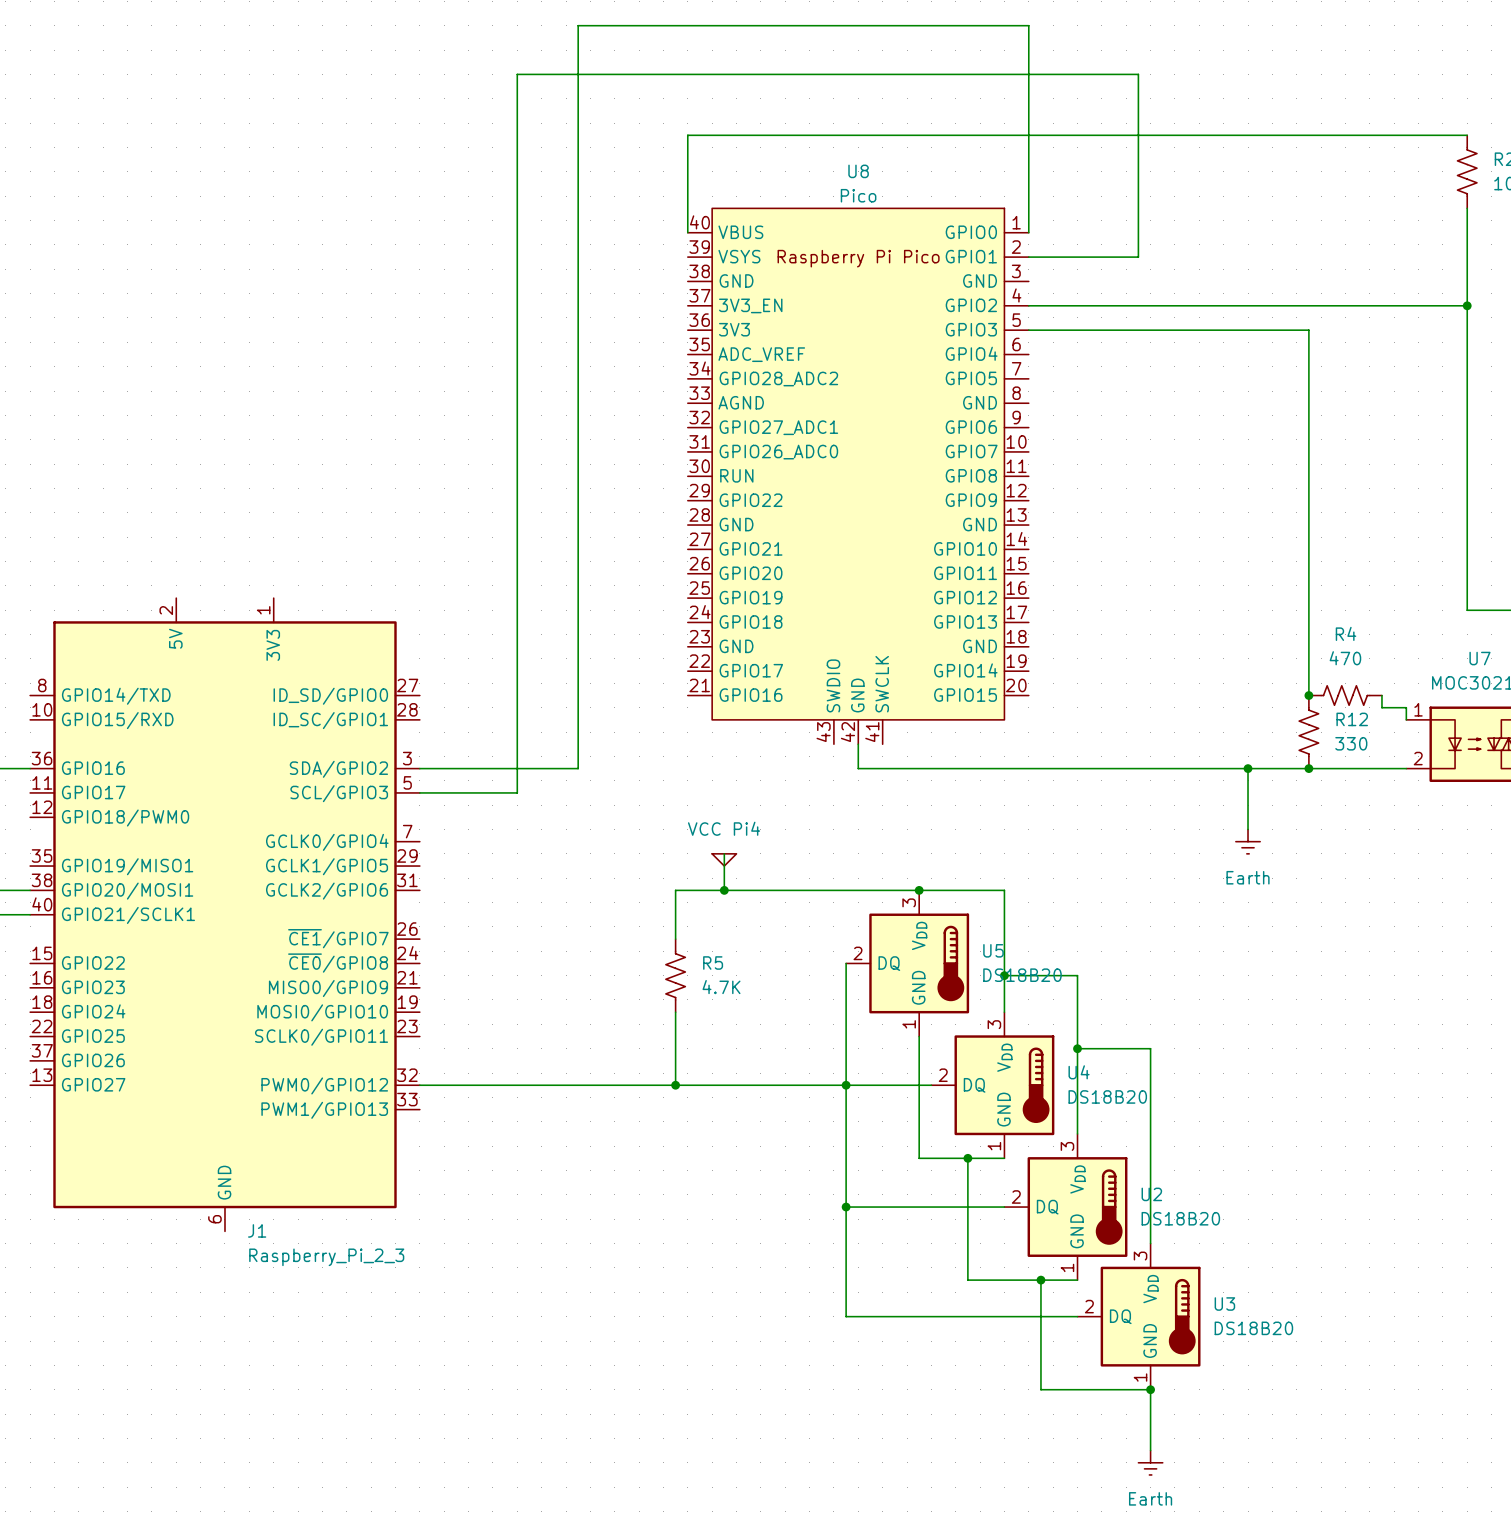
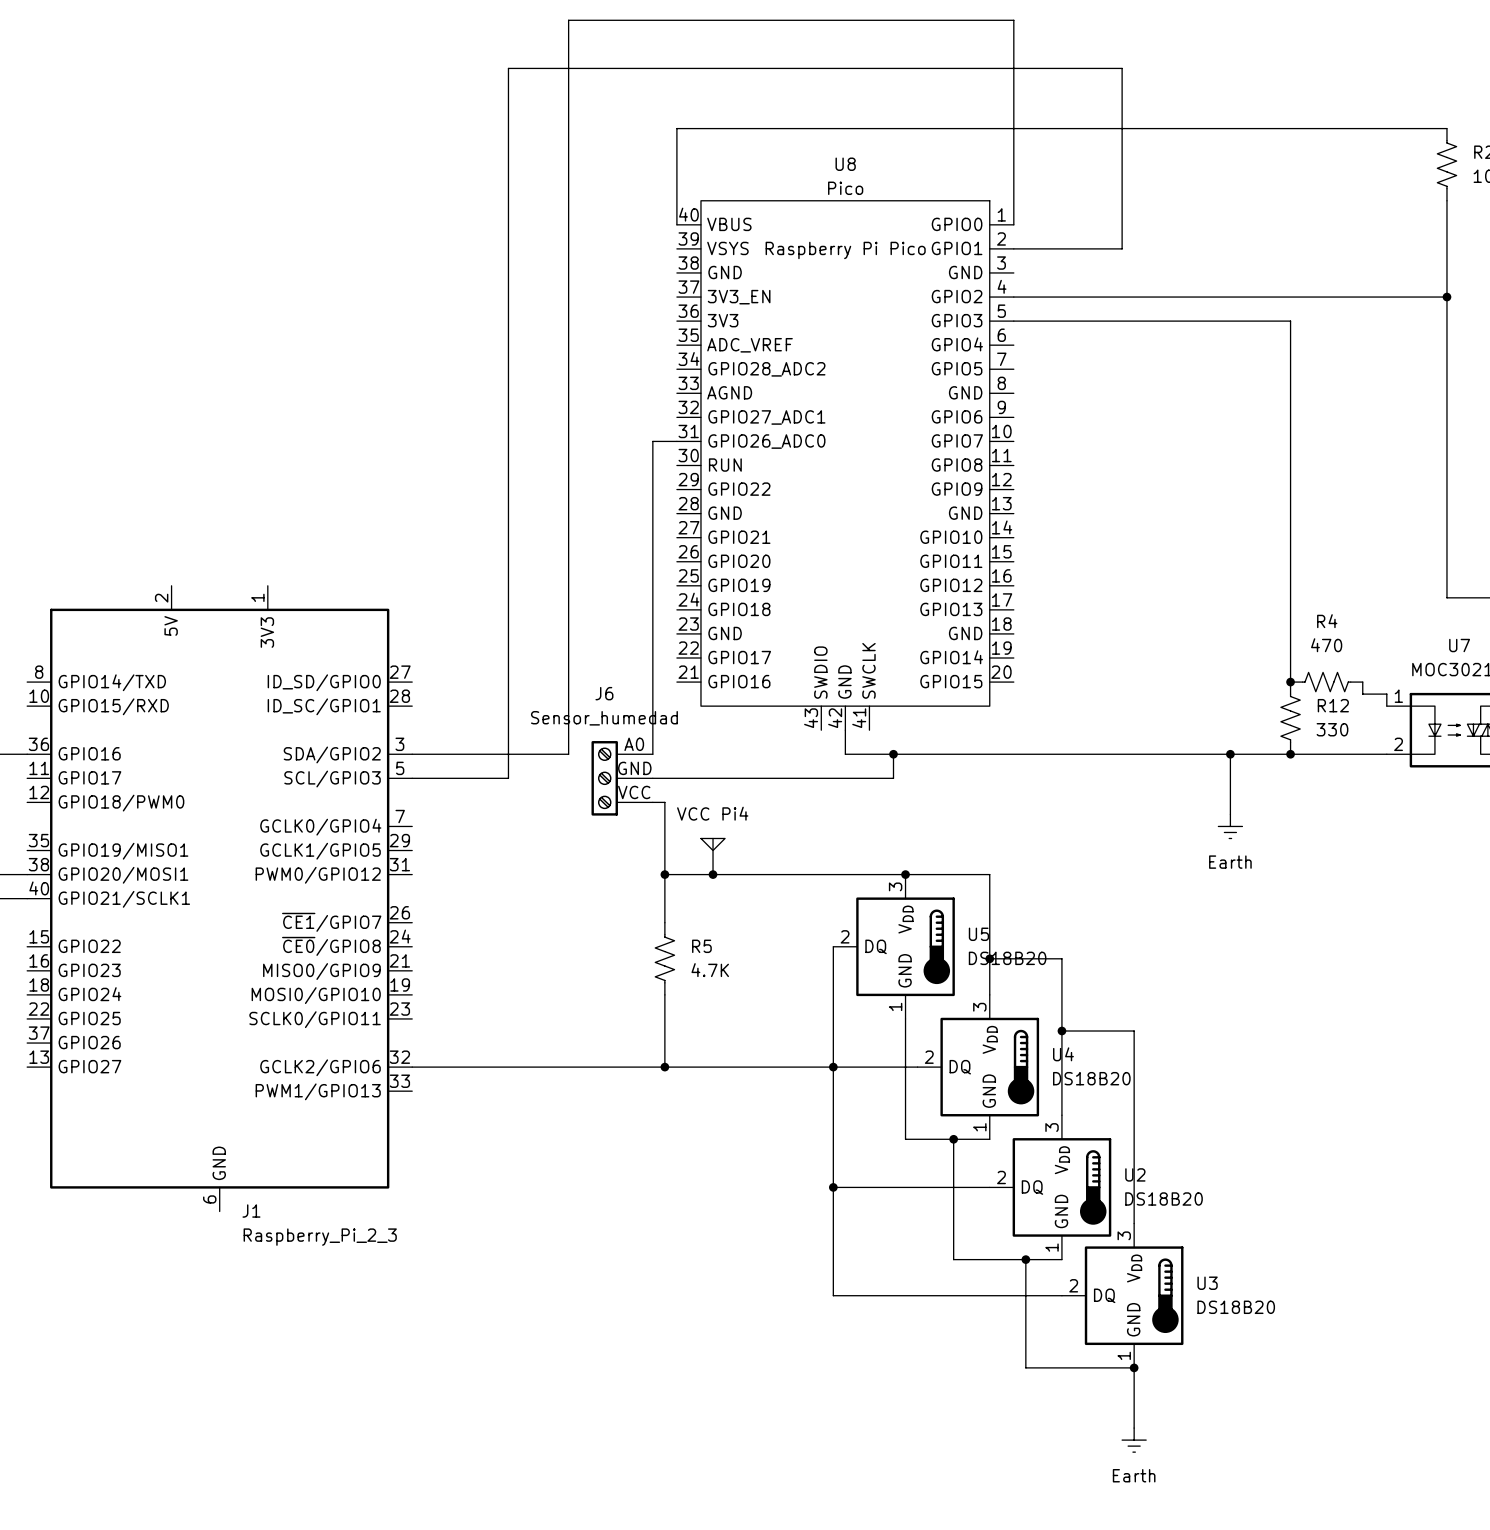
wire: none -> (676, 441) (652, 441) (652, 754)
wire: none -> (893, 754) (893, 778) (652, 778)
junction: none -> (893, 754)
J6: none -> Sensor_humedad (622, 778)
wire: none -> (652, 802) (664, 802) (664, 874)
junction: none -> (664, 874)
J1 pin name: GCLK2/GPIO6 (327, 891) -> PWM0/GPIO12 (318, 875)
J1 pin name: PWM0/GPIO12 (324, 1085) -> GCLK2/GPIO6 (320, 1067)

